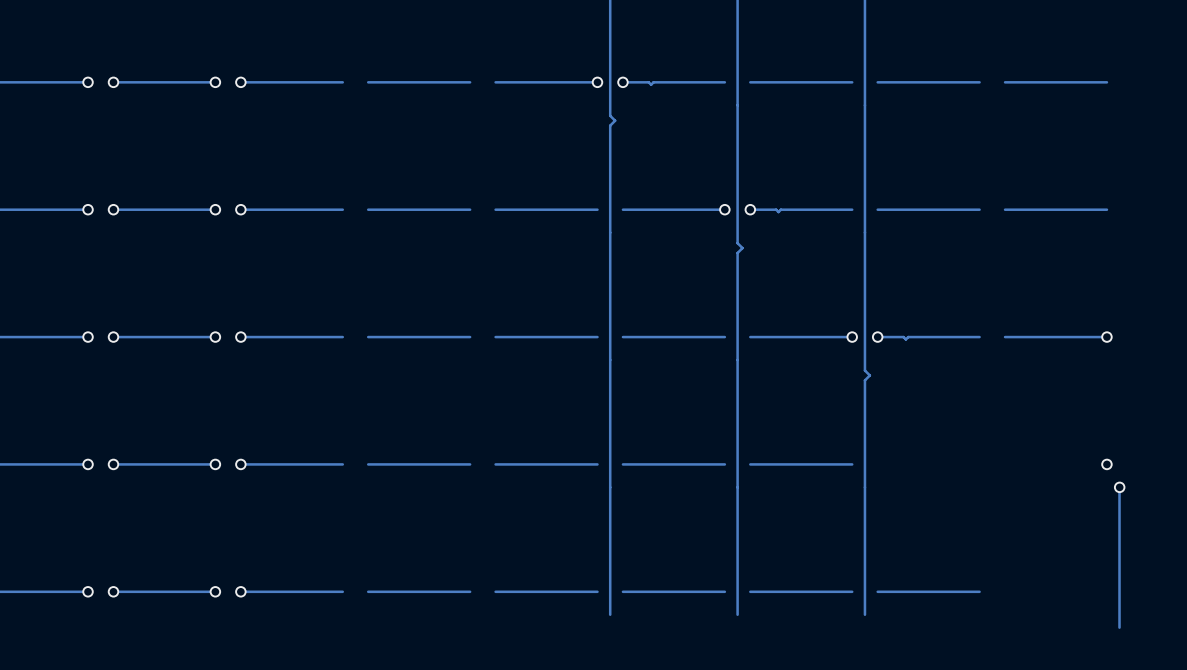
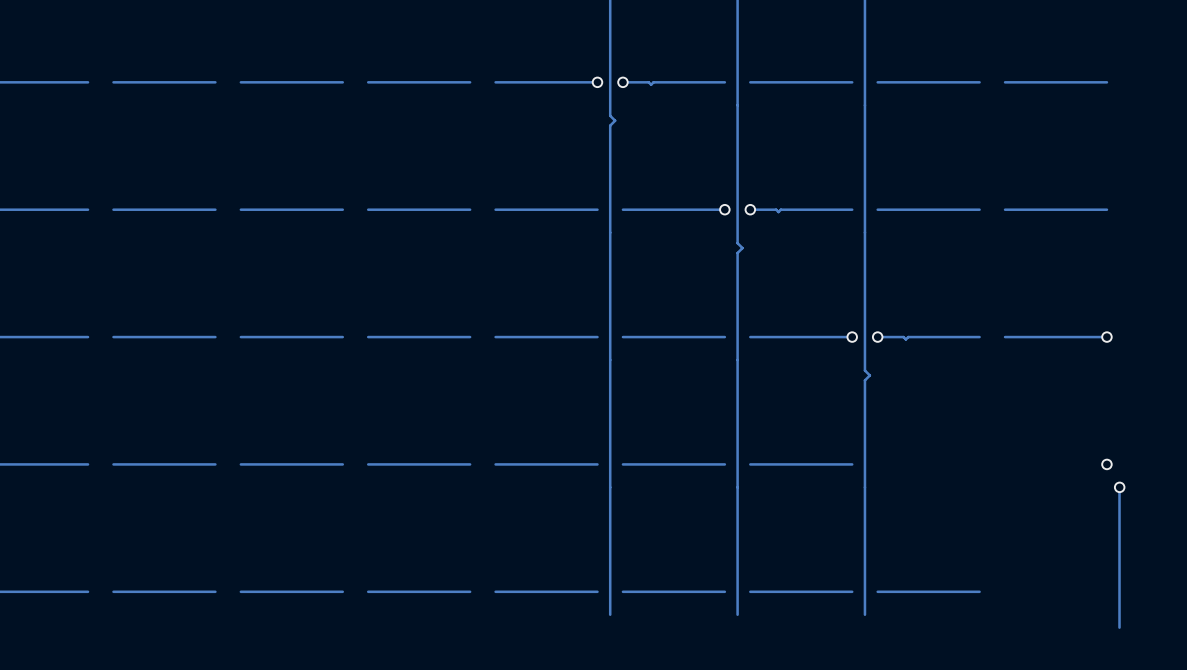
via: (88, 82) -> none
via: (113, 82) -> none
via: (215, 82) -> none
via: (240, 82) -> none
via: (88, 209) -> none
via: (113, 209) -> none
via: (215, 209) -> none
via: (240, 209) -> none
via: (88, 337) -> none
via: (113, 337) -> none
via: (215, 337) -> none
via: (240, 337) -> none
via: (88, 464) -> none
via: (113, 464) -> none
via: (215, 464) -> none
via: (240, 464) -> none
via: (88, 591) -> none
via: (113, 591) -> none
via: (215, 591) -> none
via: (240, 591) -> none

